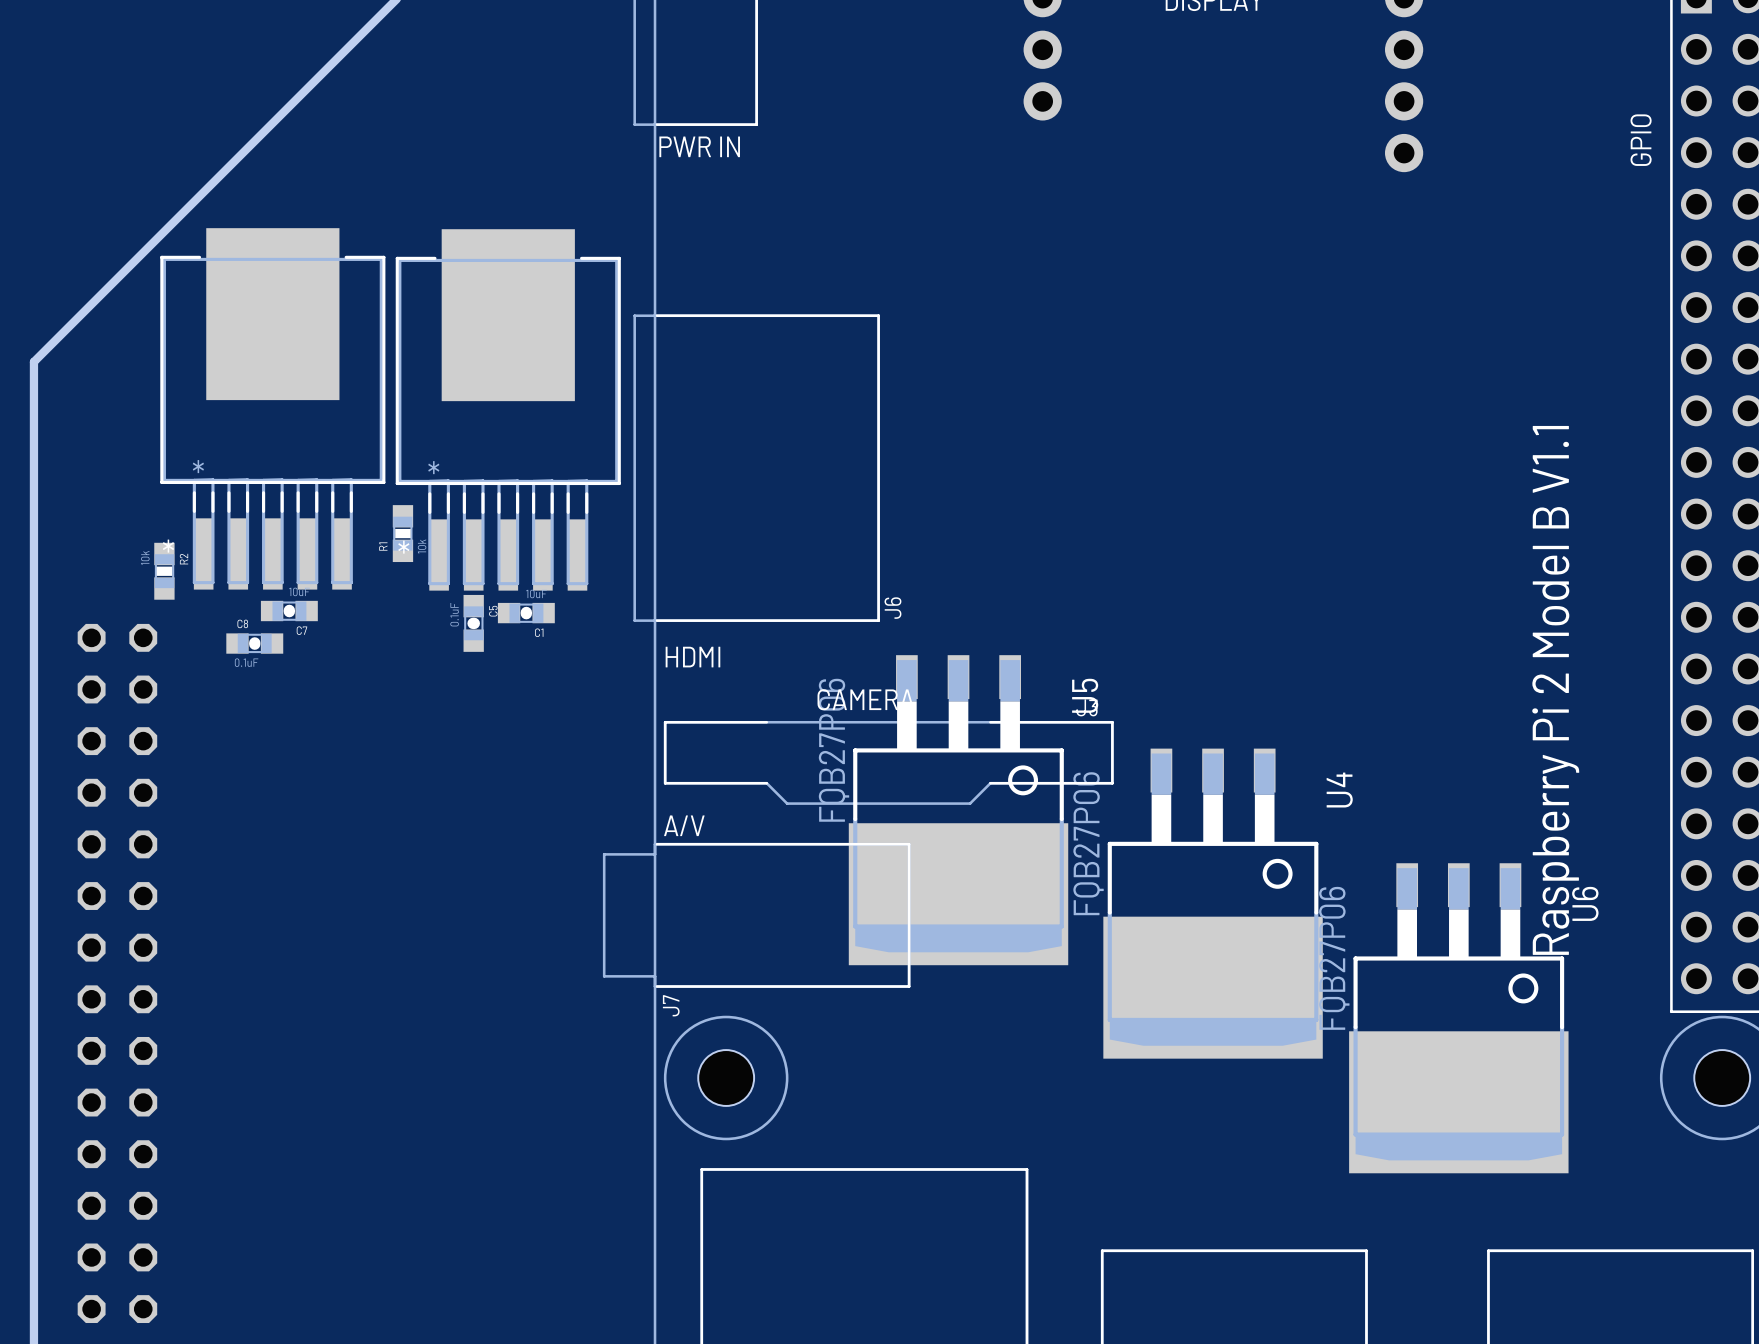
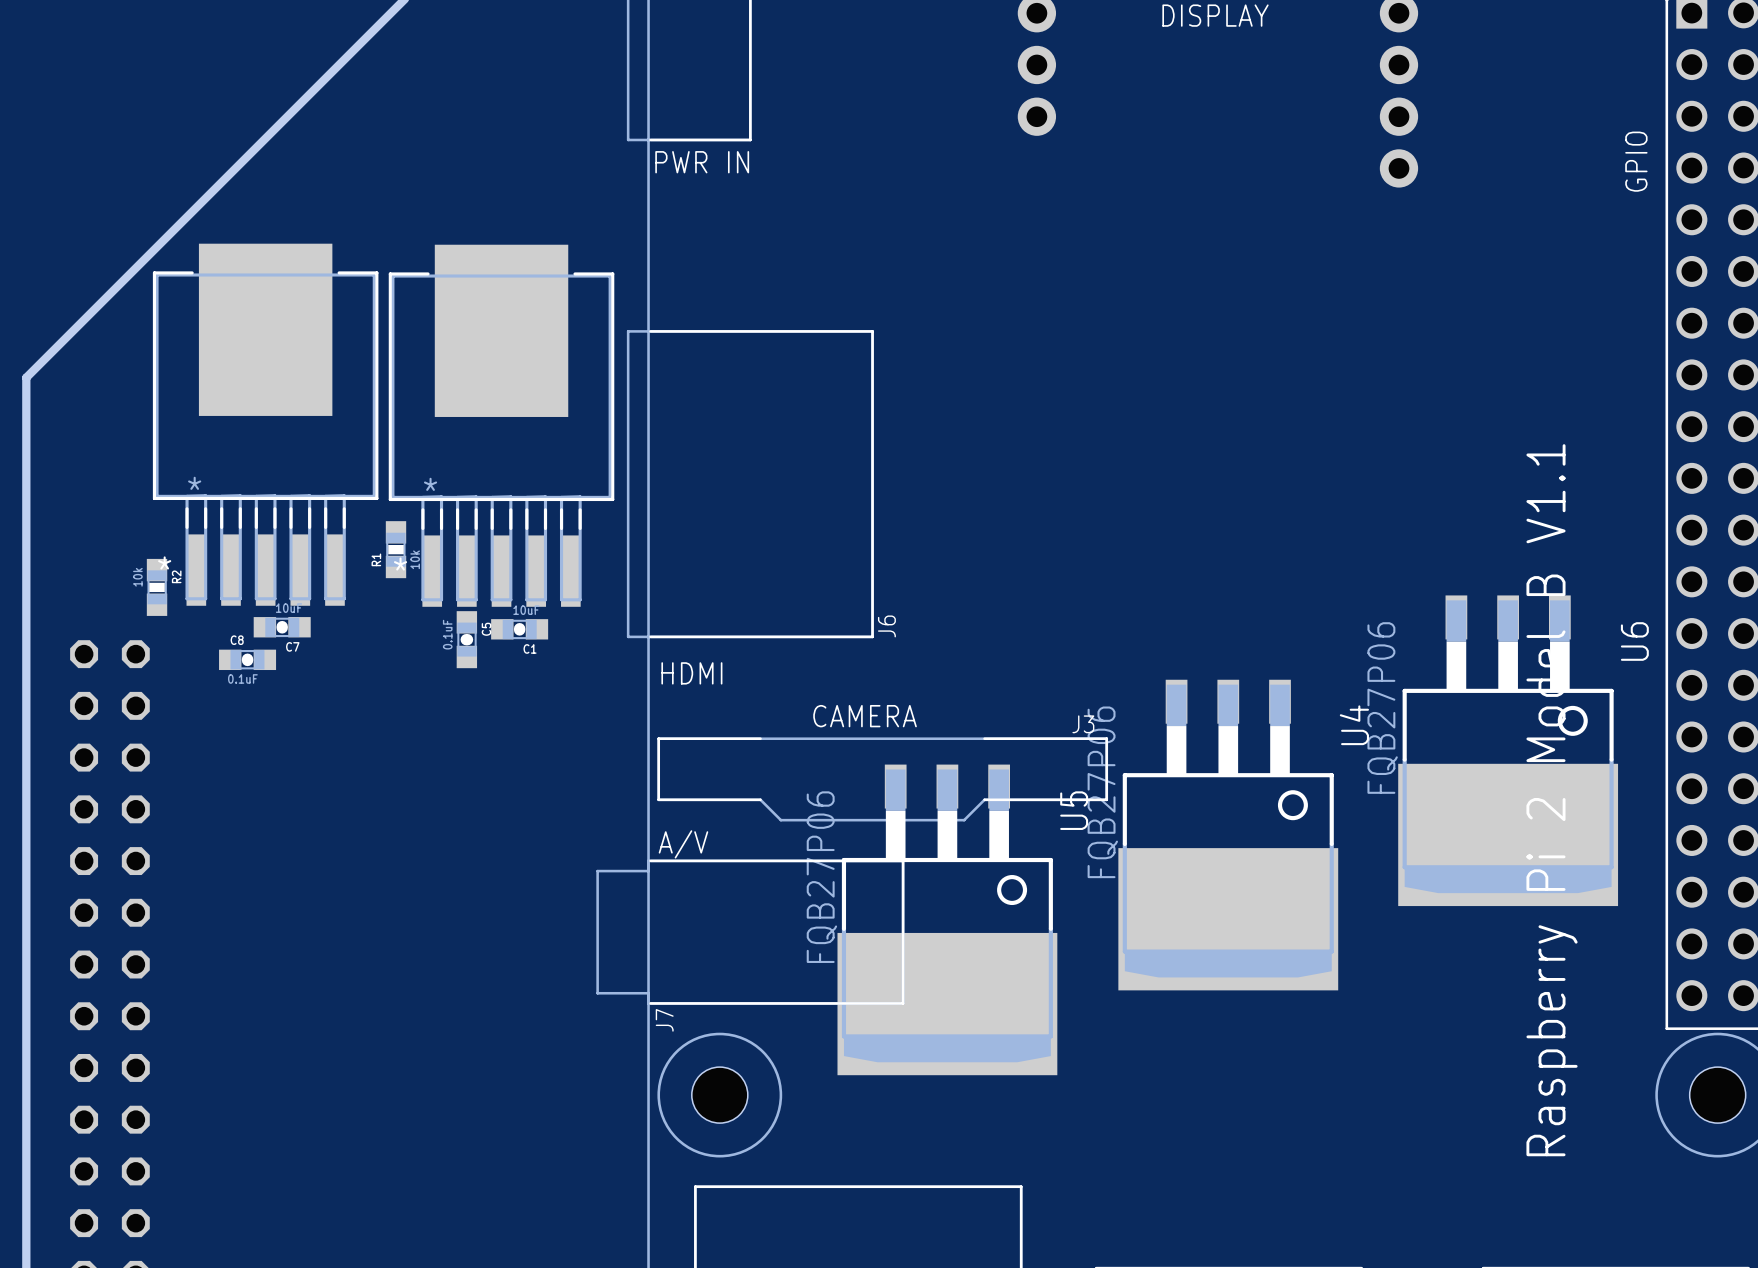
U5 position: (958, 810) -> (947, 919)
U4 position: (1213, 903) -> (1228, 835)
U6 position: (1458, 1018) -> (1508, 750)

